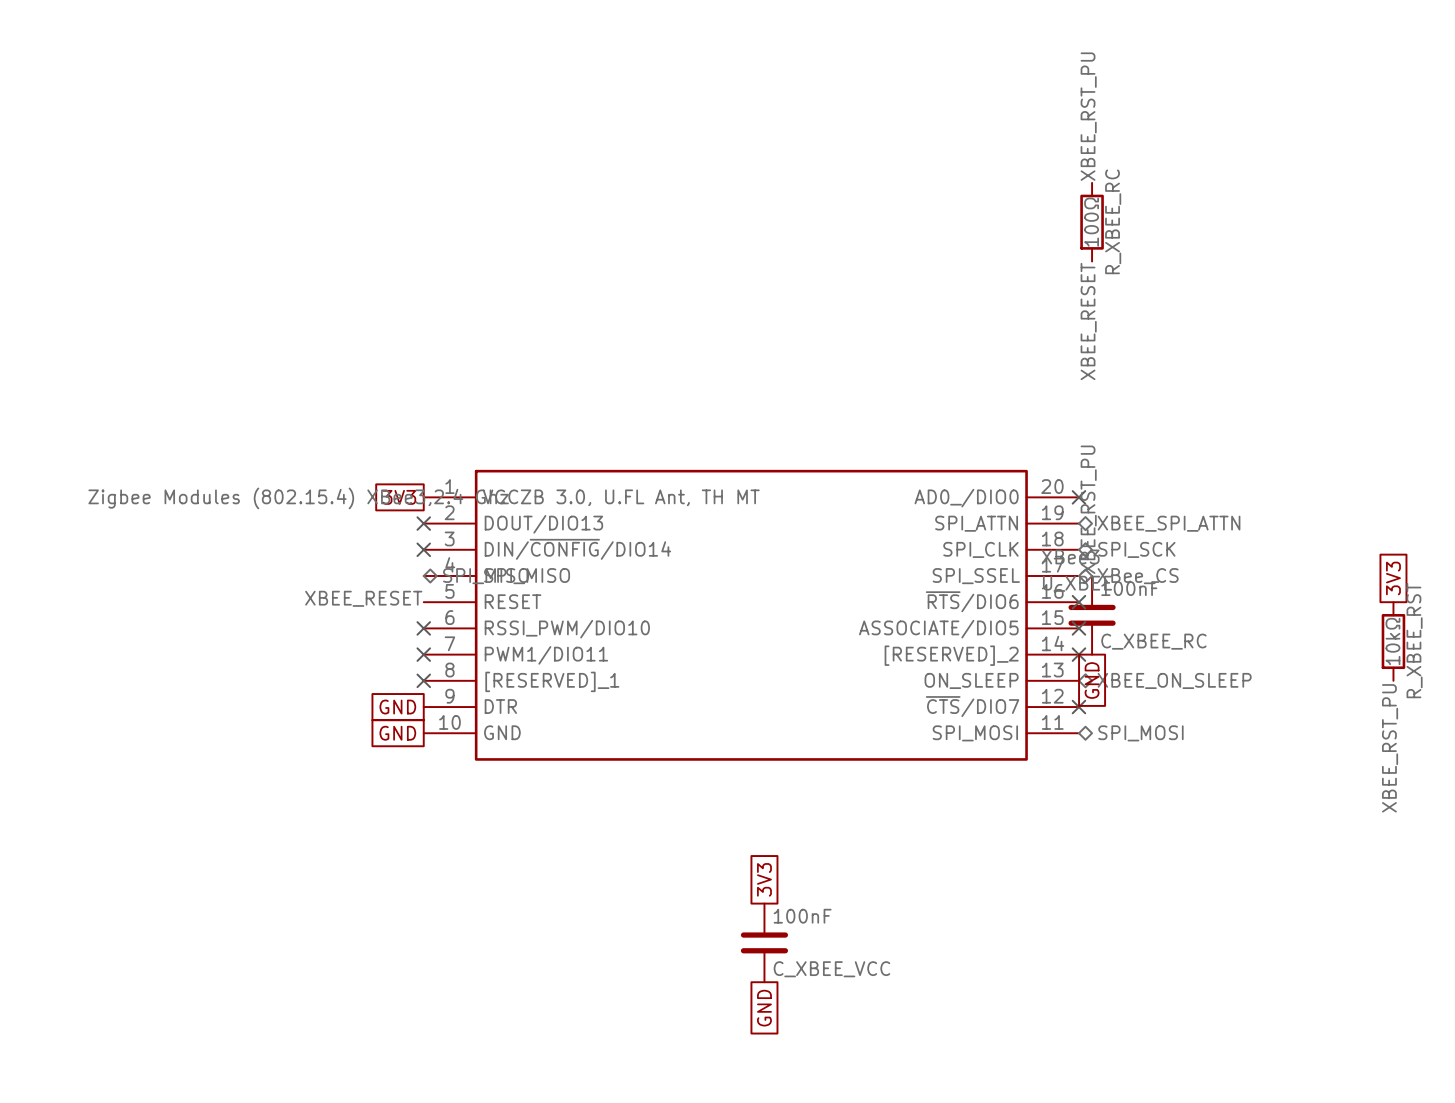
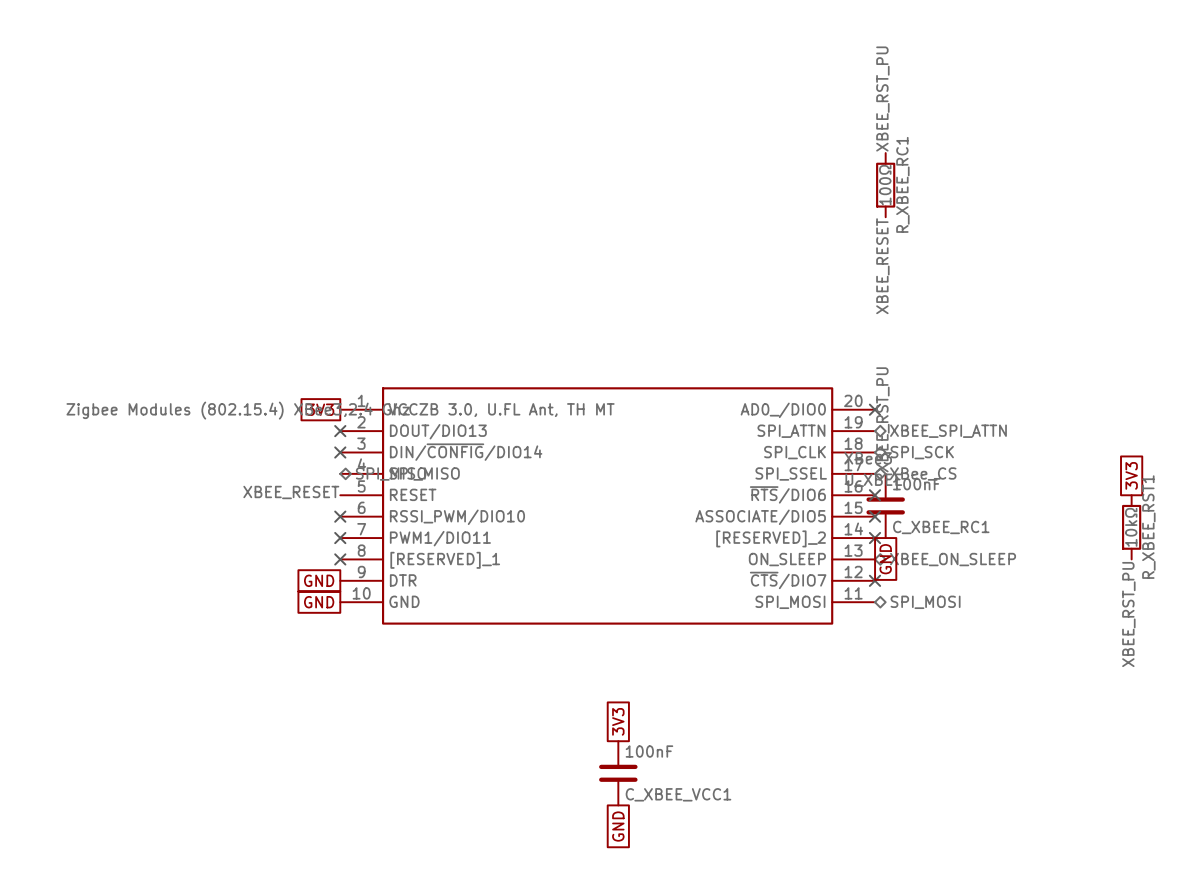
R_XBEE_RC name: R_XBEE_RC (1113, 221) -> R_XBEE_RC1 (902, 184)
R_XBEE_RST name: R_XBEE_RST (1414, 640) -> R_XBEE_RST1 (1148, 527)
C_XBEE_RC name: C_XBEE_RC (1153, 641) -> C_XBEE_RC1 (941, 527)
C_XBEE_VCC name: C_XBEE_VCC (831, 969) -> C_XBEE_VCC1 (678, 794)

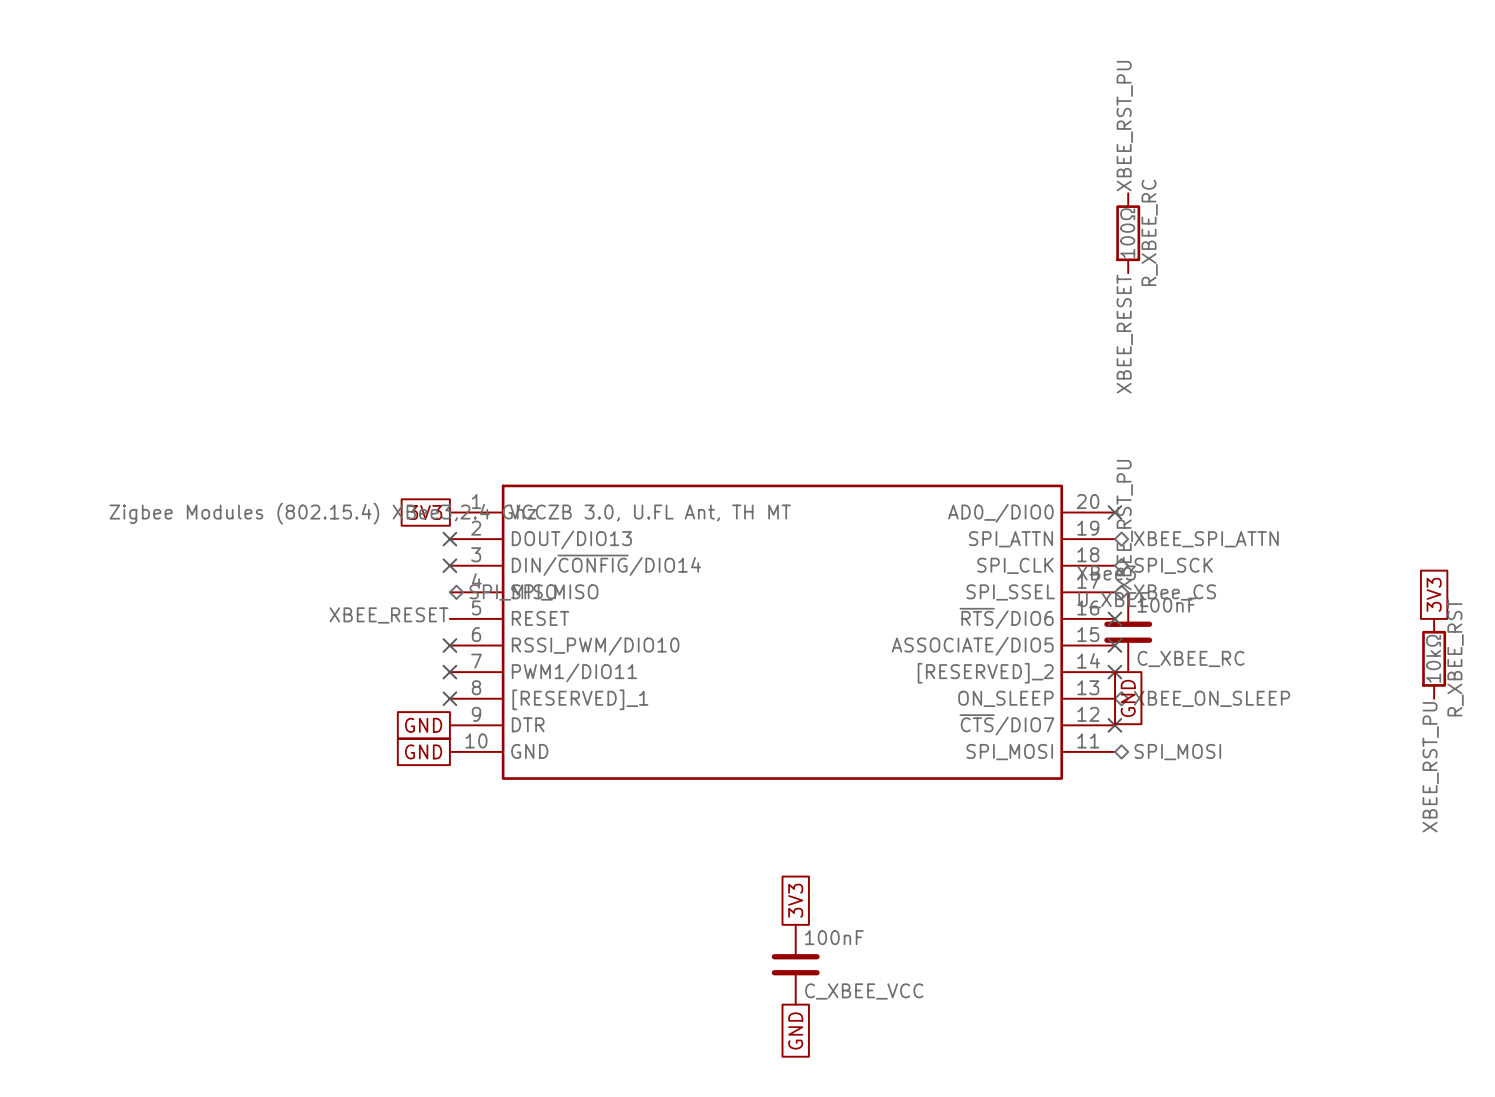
R_XBEE_RC1 name: R_XBEE_RC1 (902, 184) -> R_XBEE_RC (1149, 232)
C_XBEE_RC1 name: C_XBEE_RC1 (941, 527) -> C_XBEE_RC (1191, 658)
R_XBEE_RST1 name: R_XBEE_RST1 (1148, 527) -> R_XBEE_RST (1455, 657)
C_XBEE_VCC1 name: C_XBEE_VCC1 (678, 794) -> C_XBEE_VCC (864, 991)

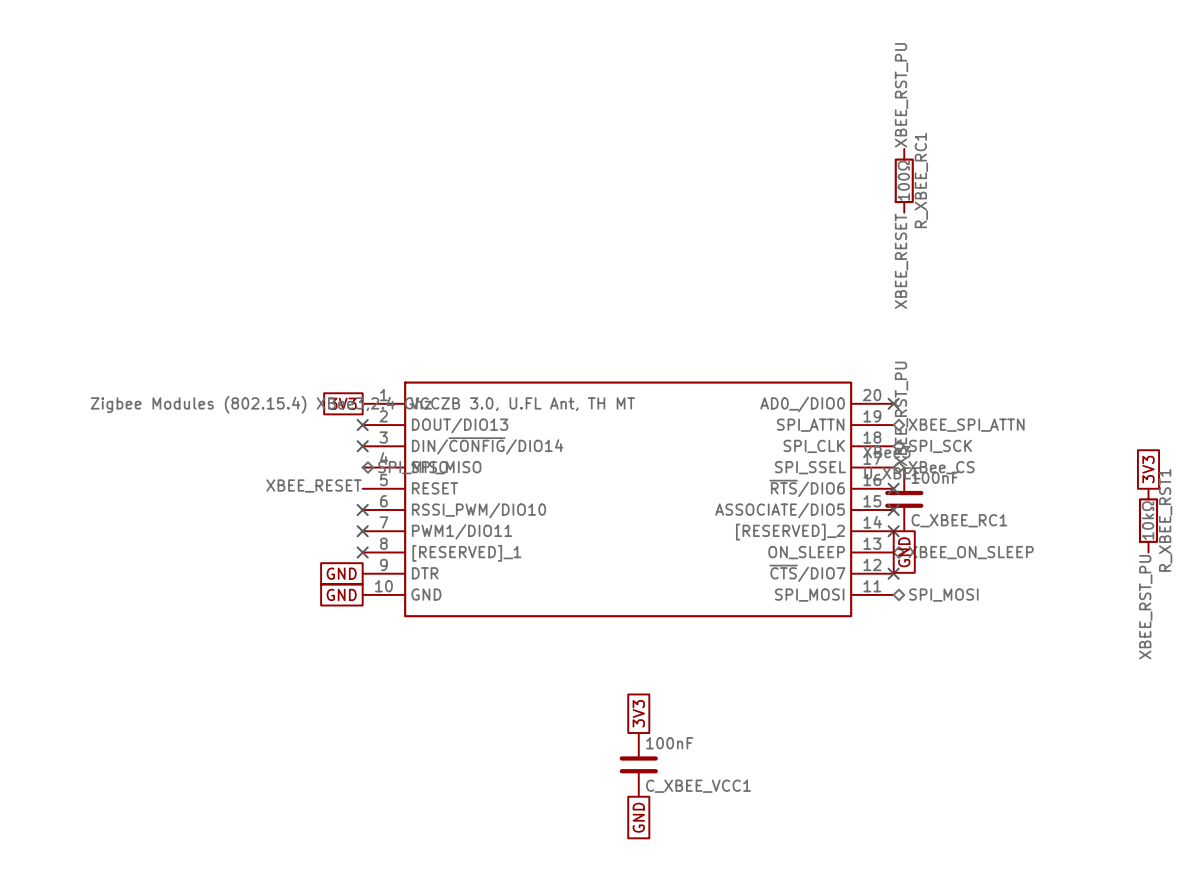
R_XBEE_RC name: R_XBEE_RC (1149, 232) -> R_XBEE_RC1 (921, 180)
R_XBEE_RST name: R_XBEE_RST (1455, 657) -> R_XBEE_RST1 (1165, 520)
C_XBEE_RC name: C_XBEE_RC (1191, 658) -> C_XBEE_RC1 (959, 520)
C_XBEE_VCC name: C_XBEE_VCC (864, 991) -> C_XBEE_VCC1 (698, 786)

